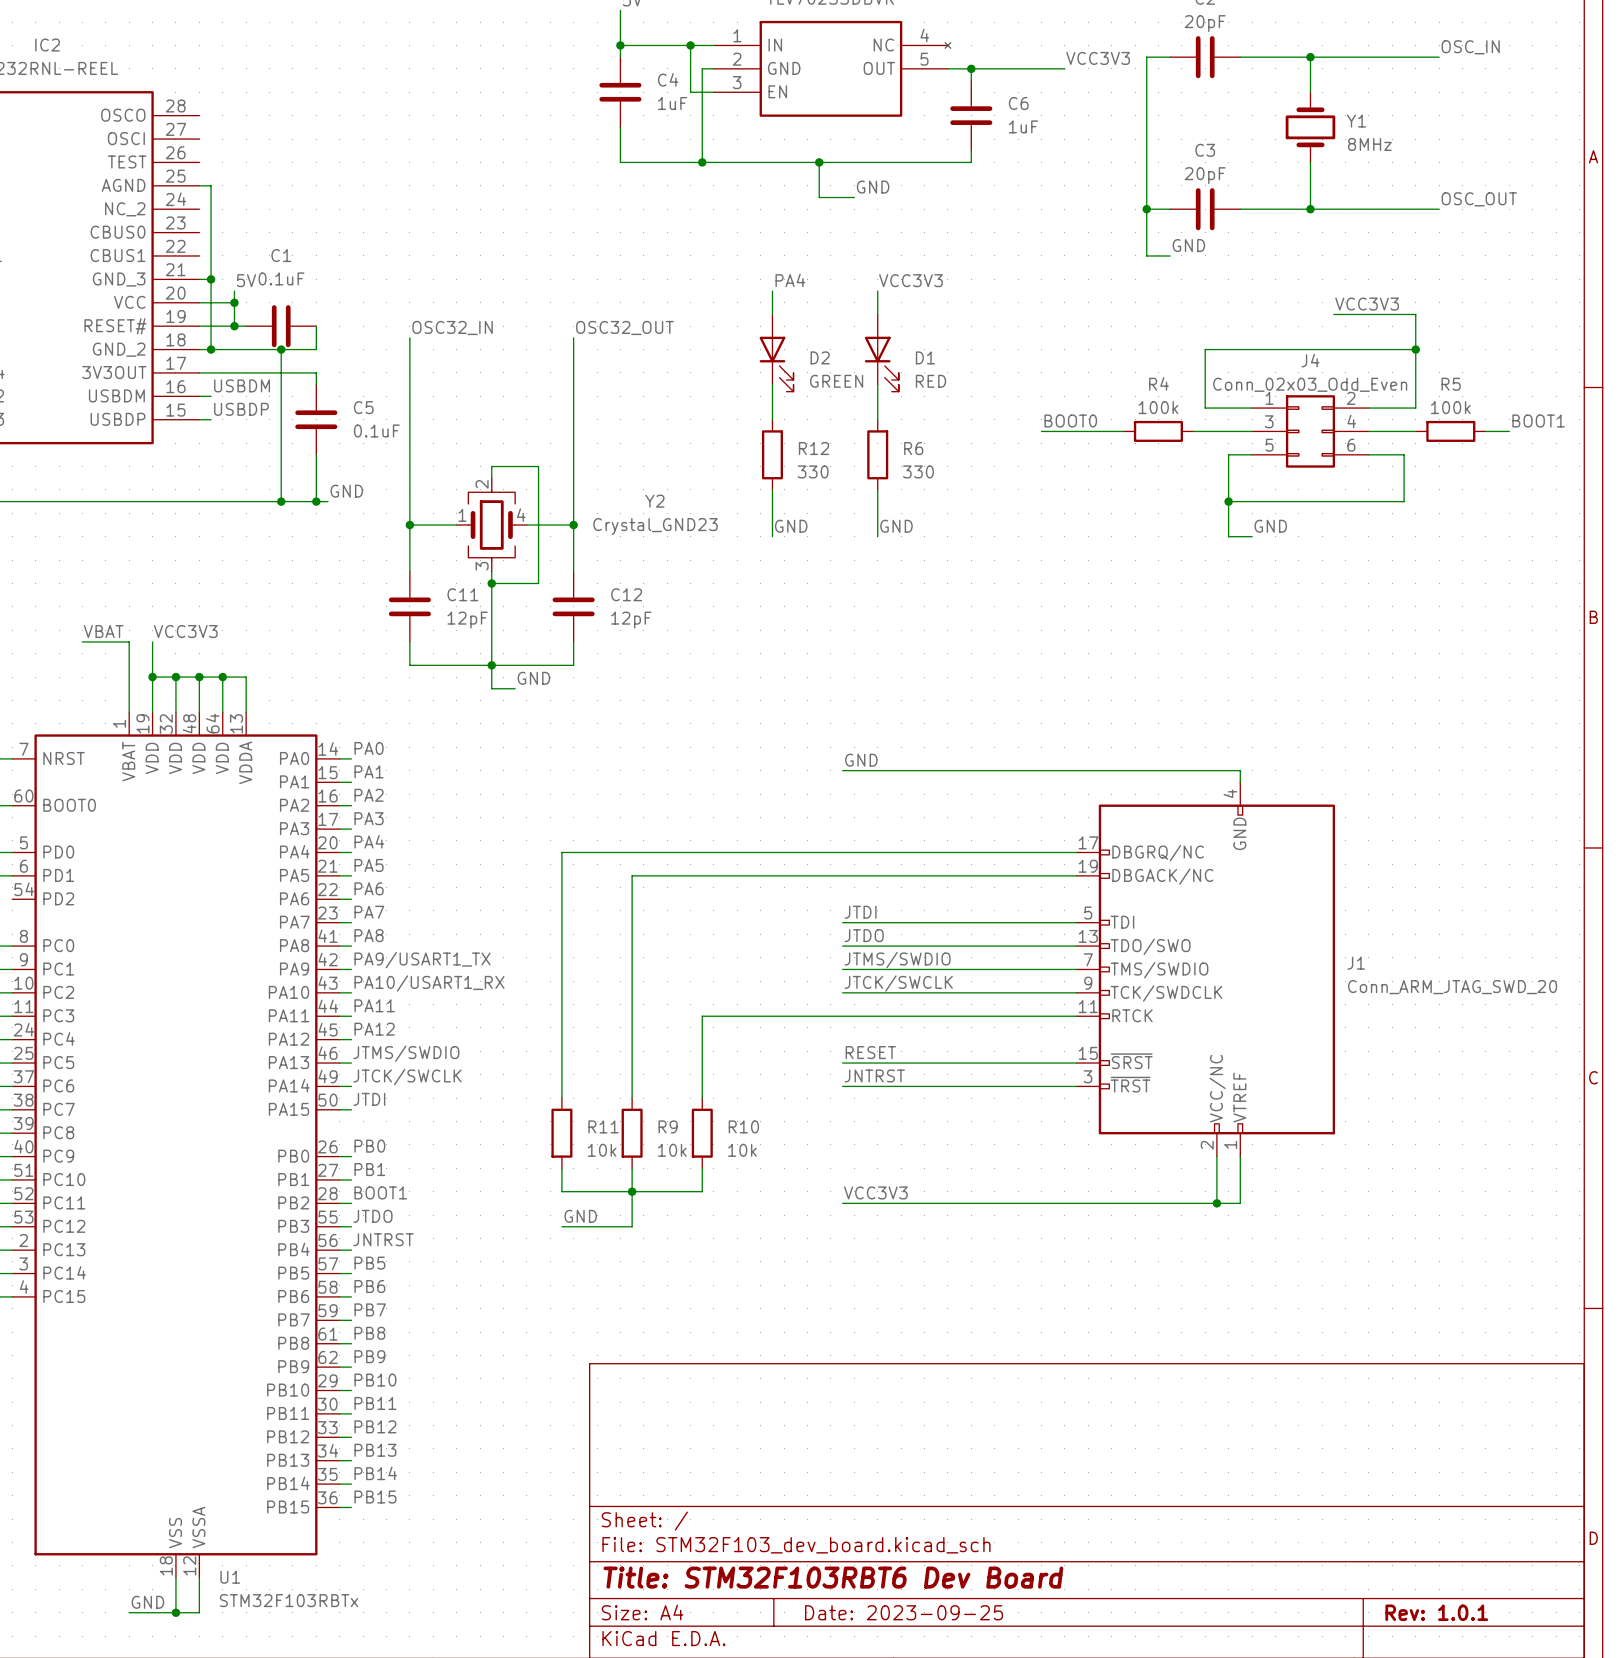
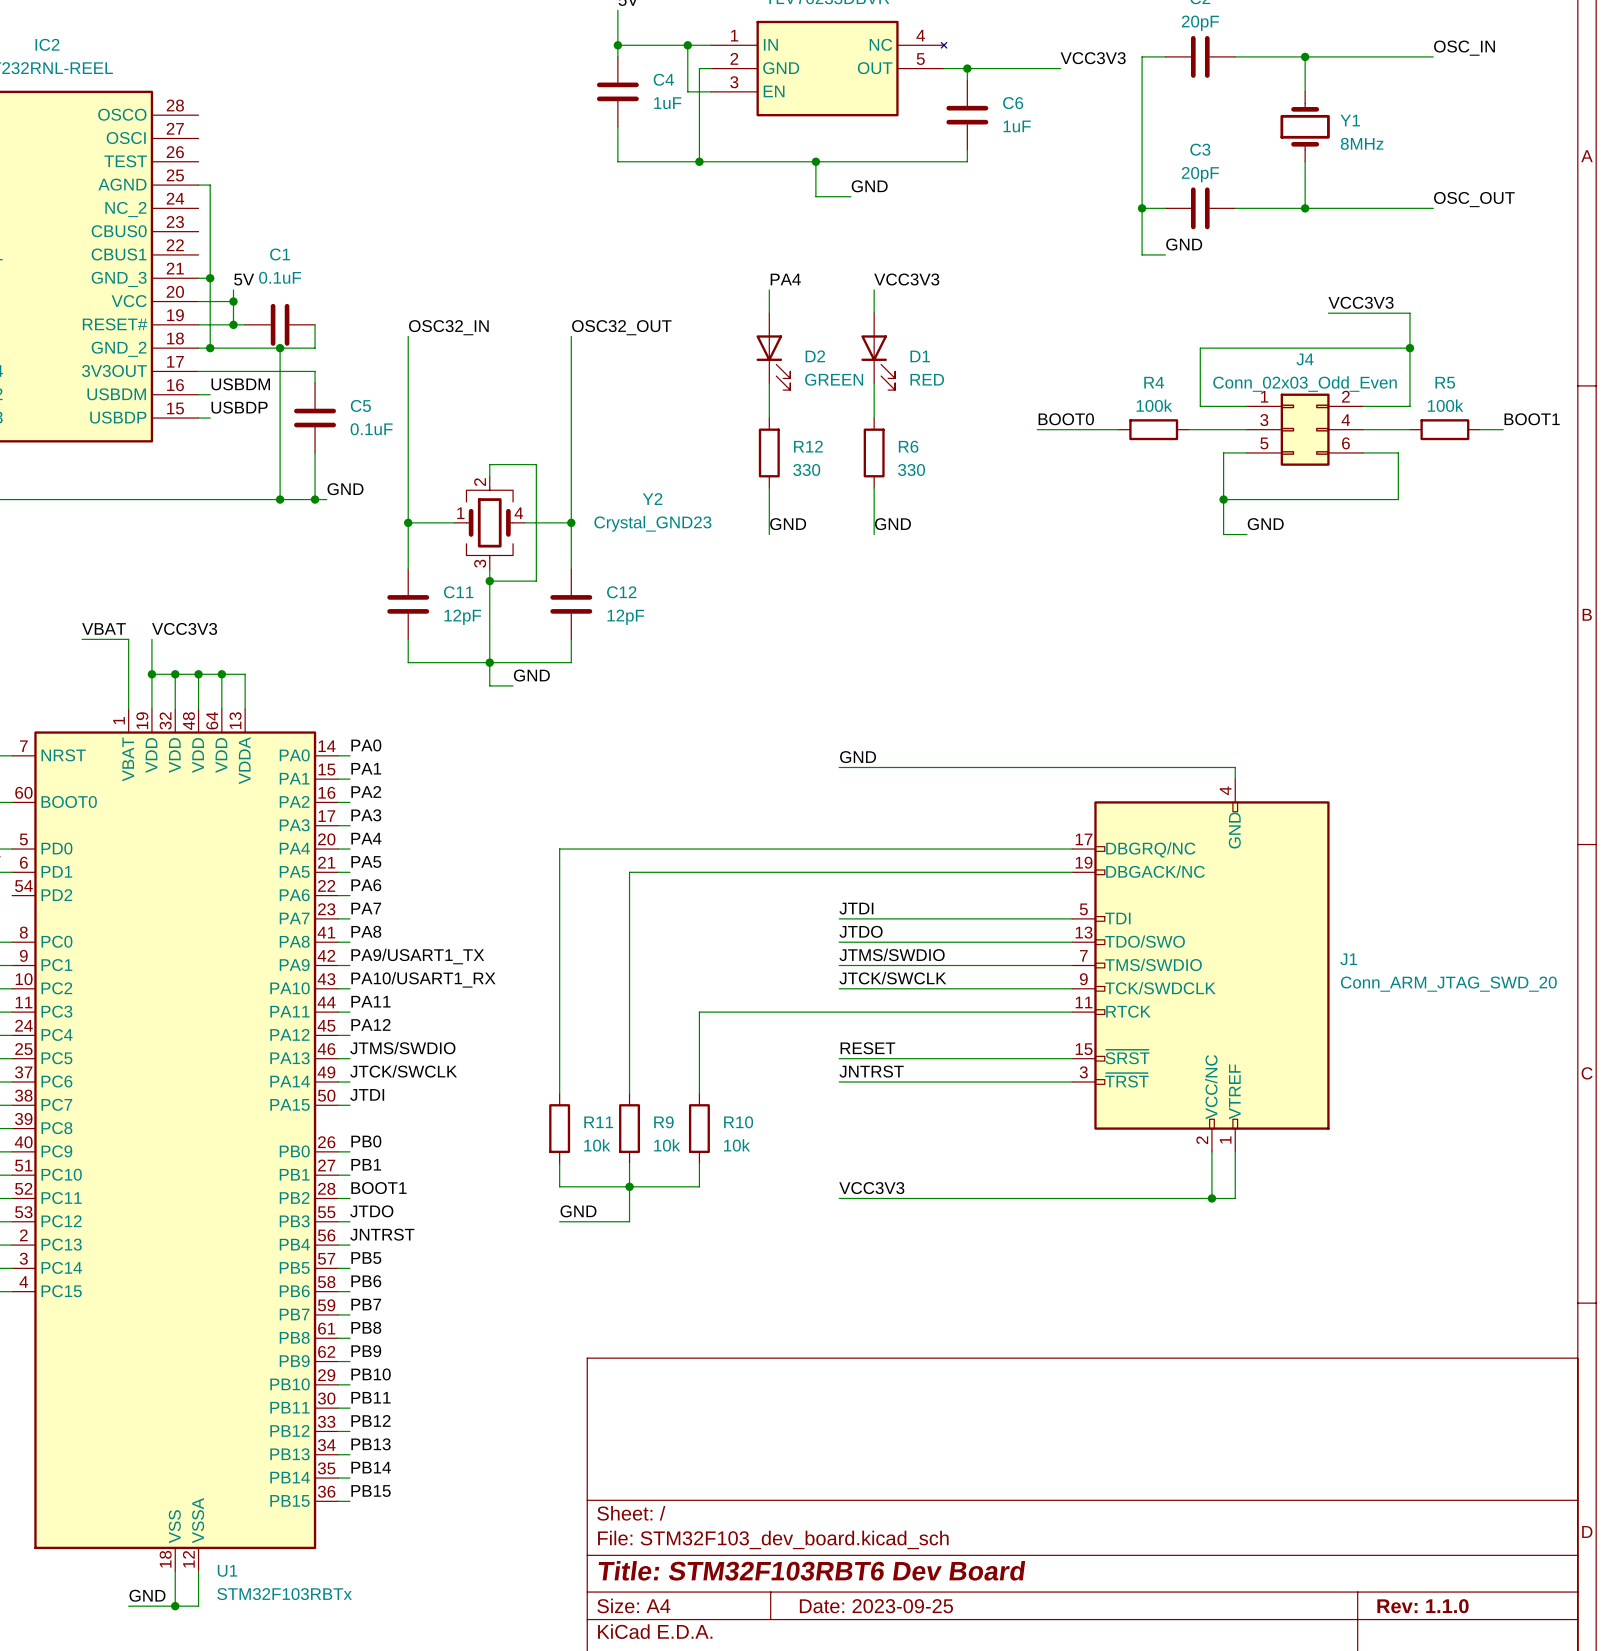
title block: Rev: 1.0.1 (1436, 1612) -> Rev: 1.1.0 (1422, 1606)

